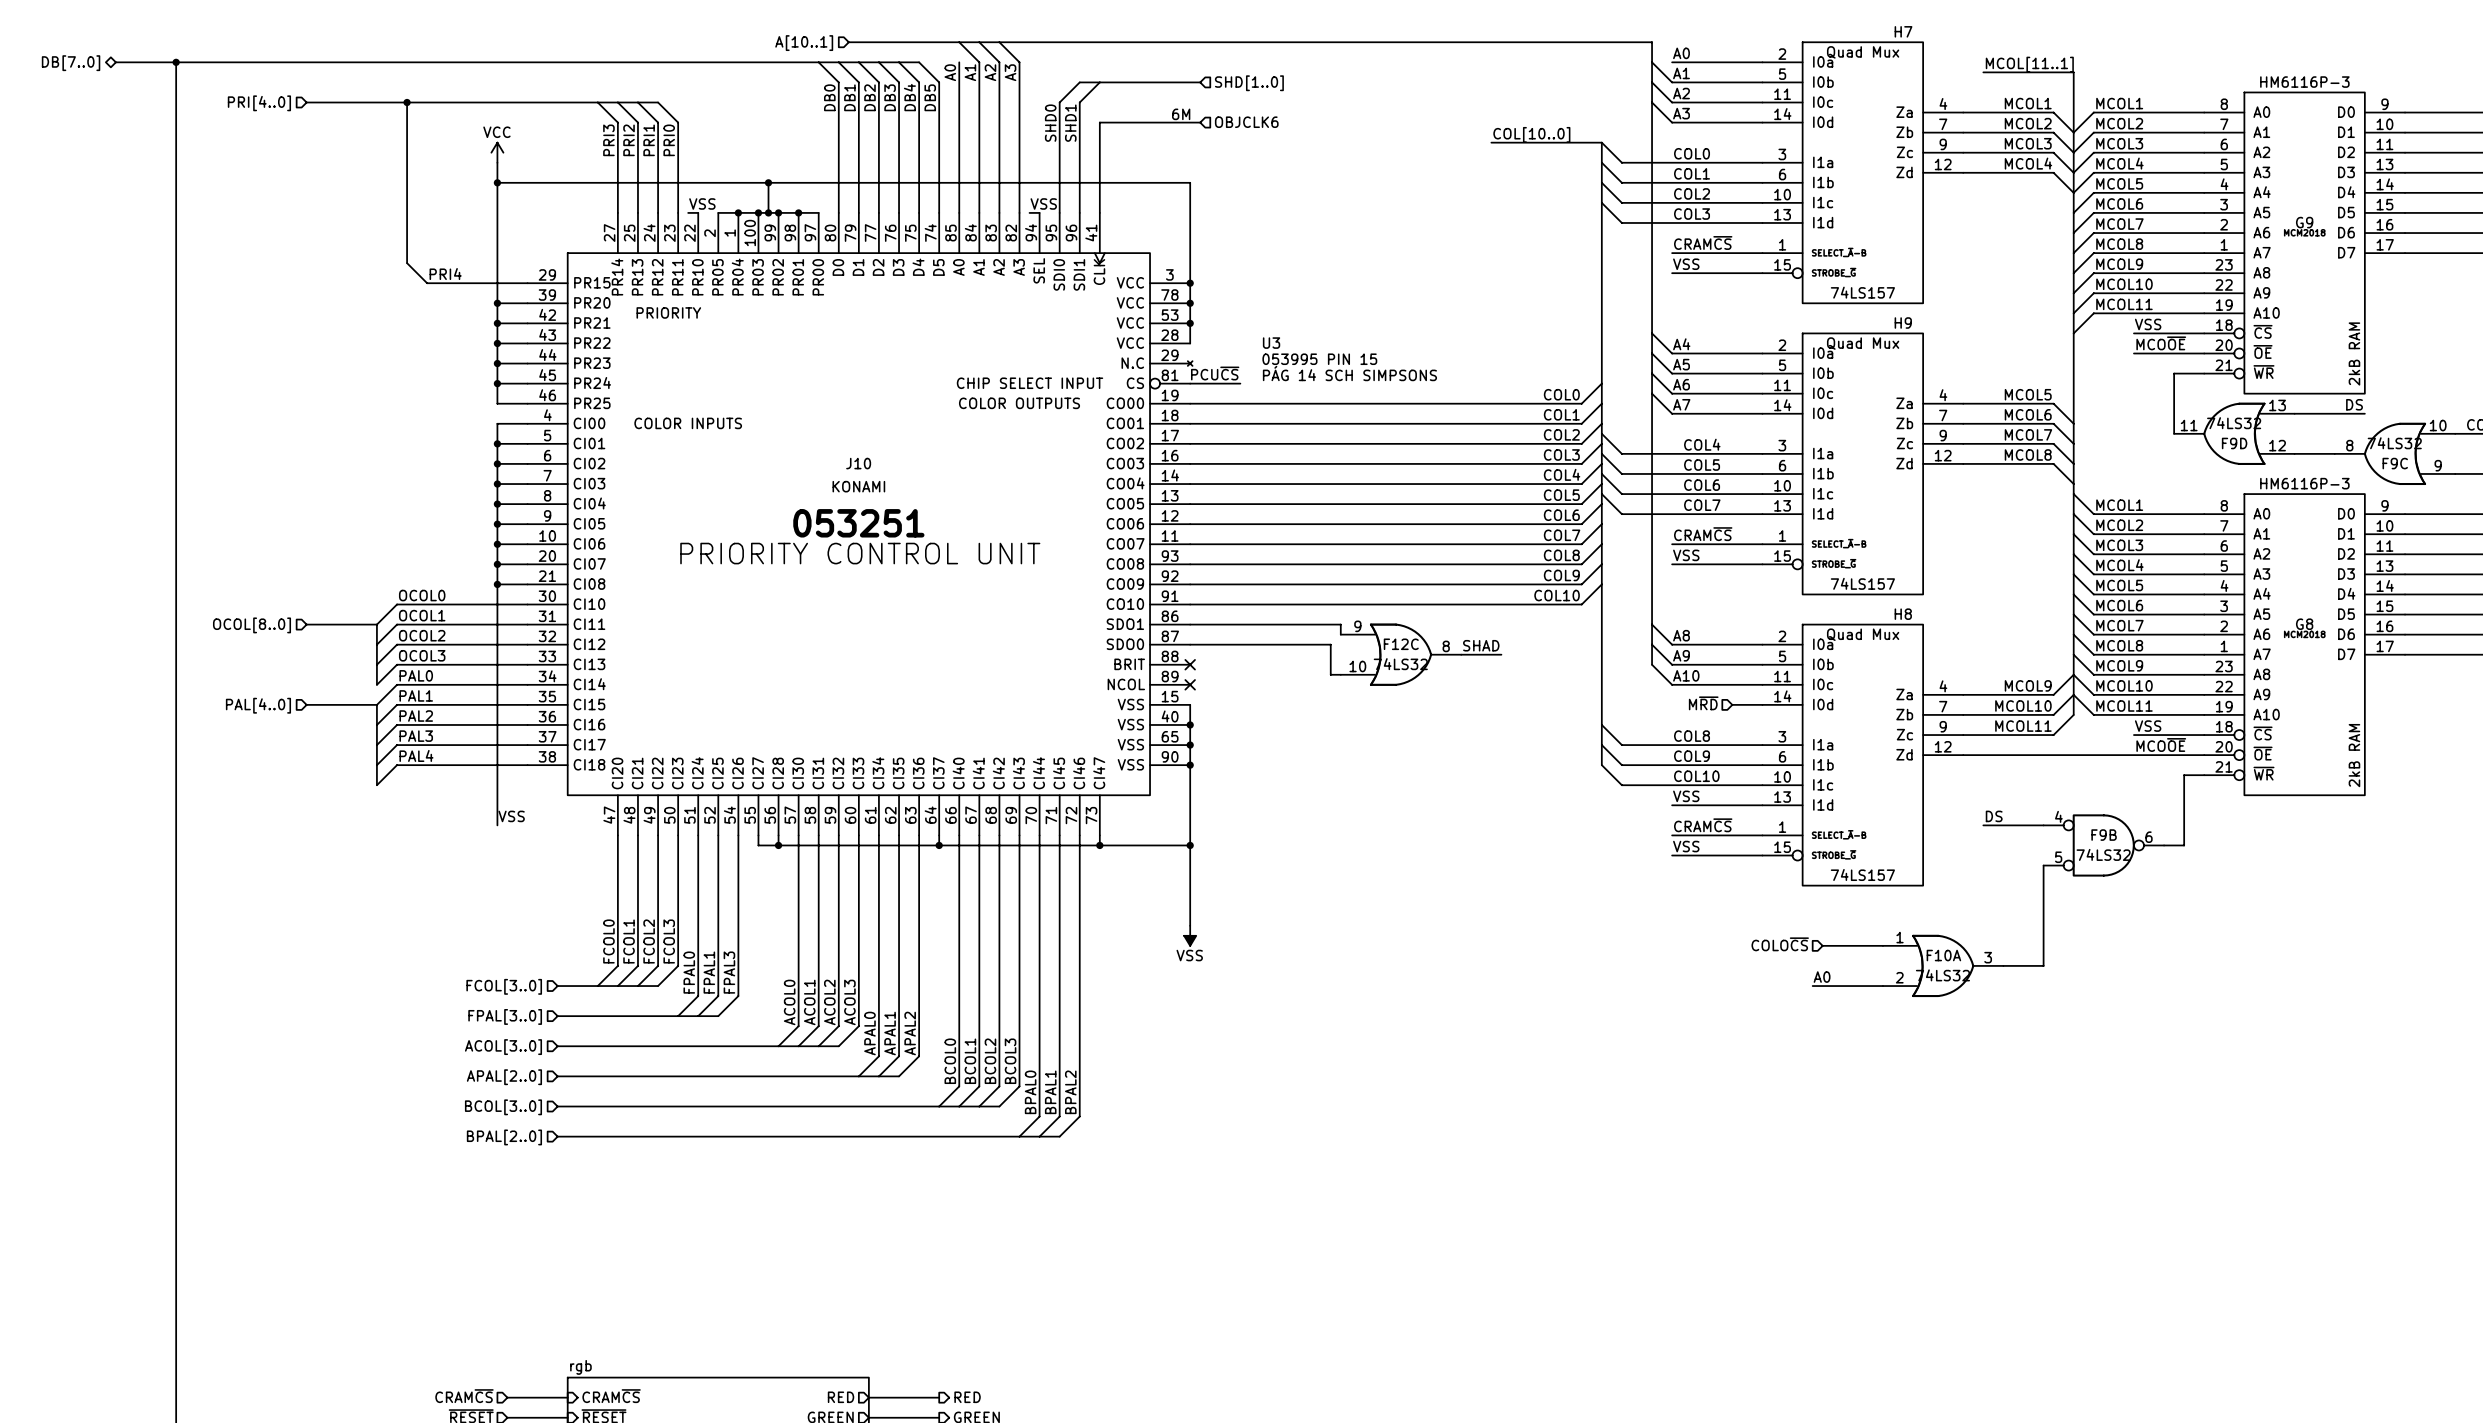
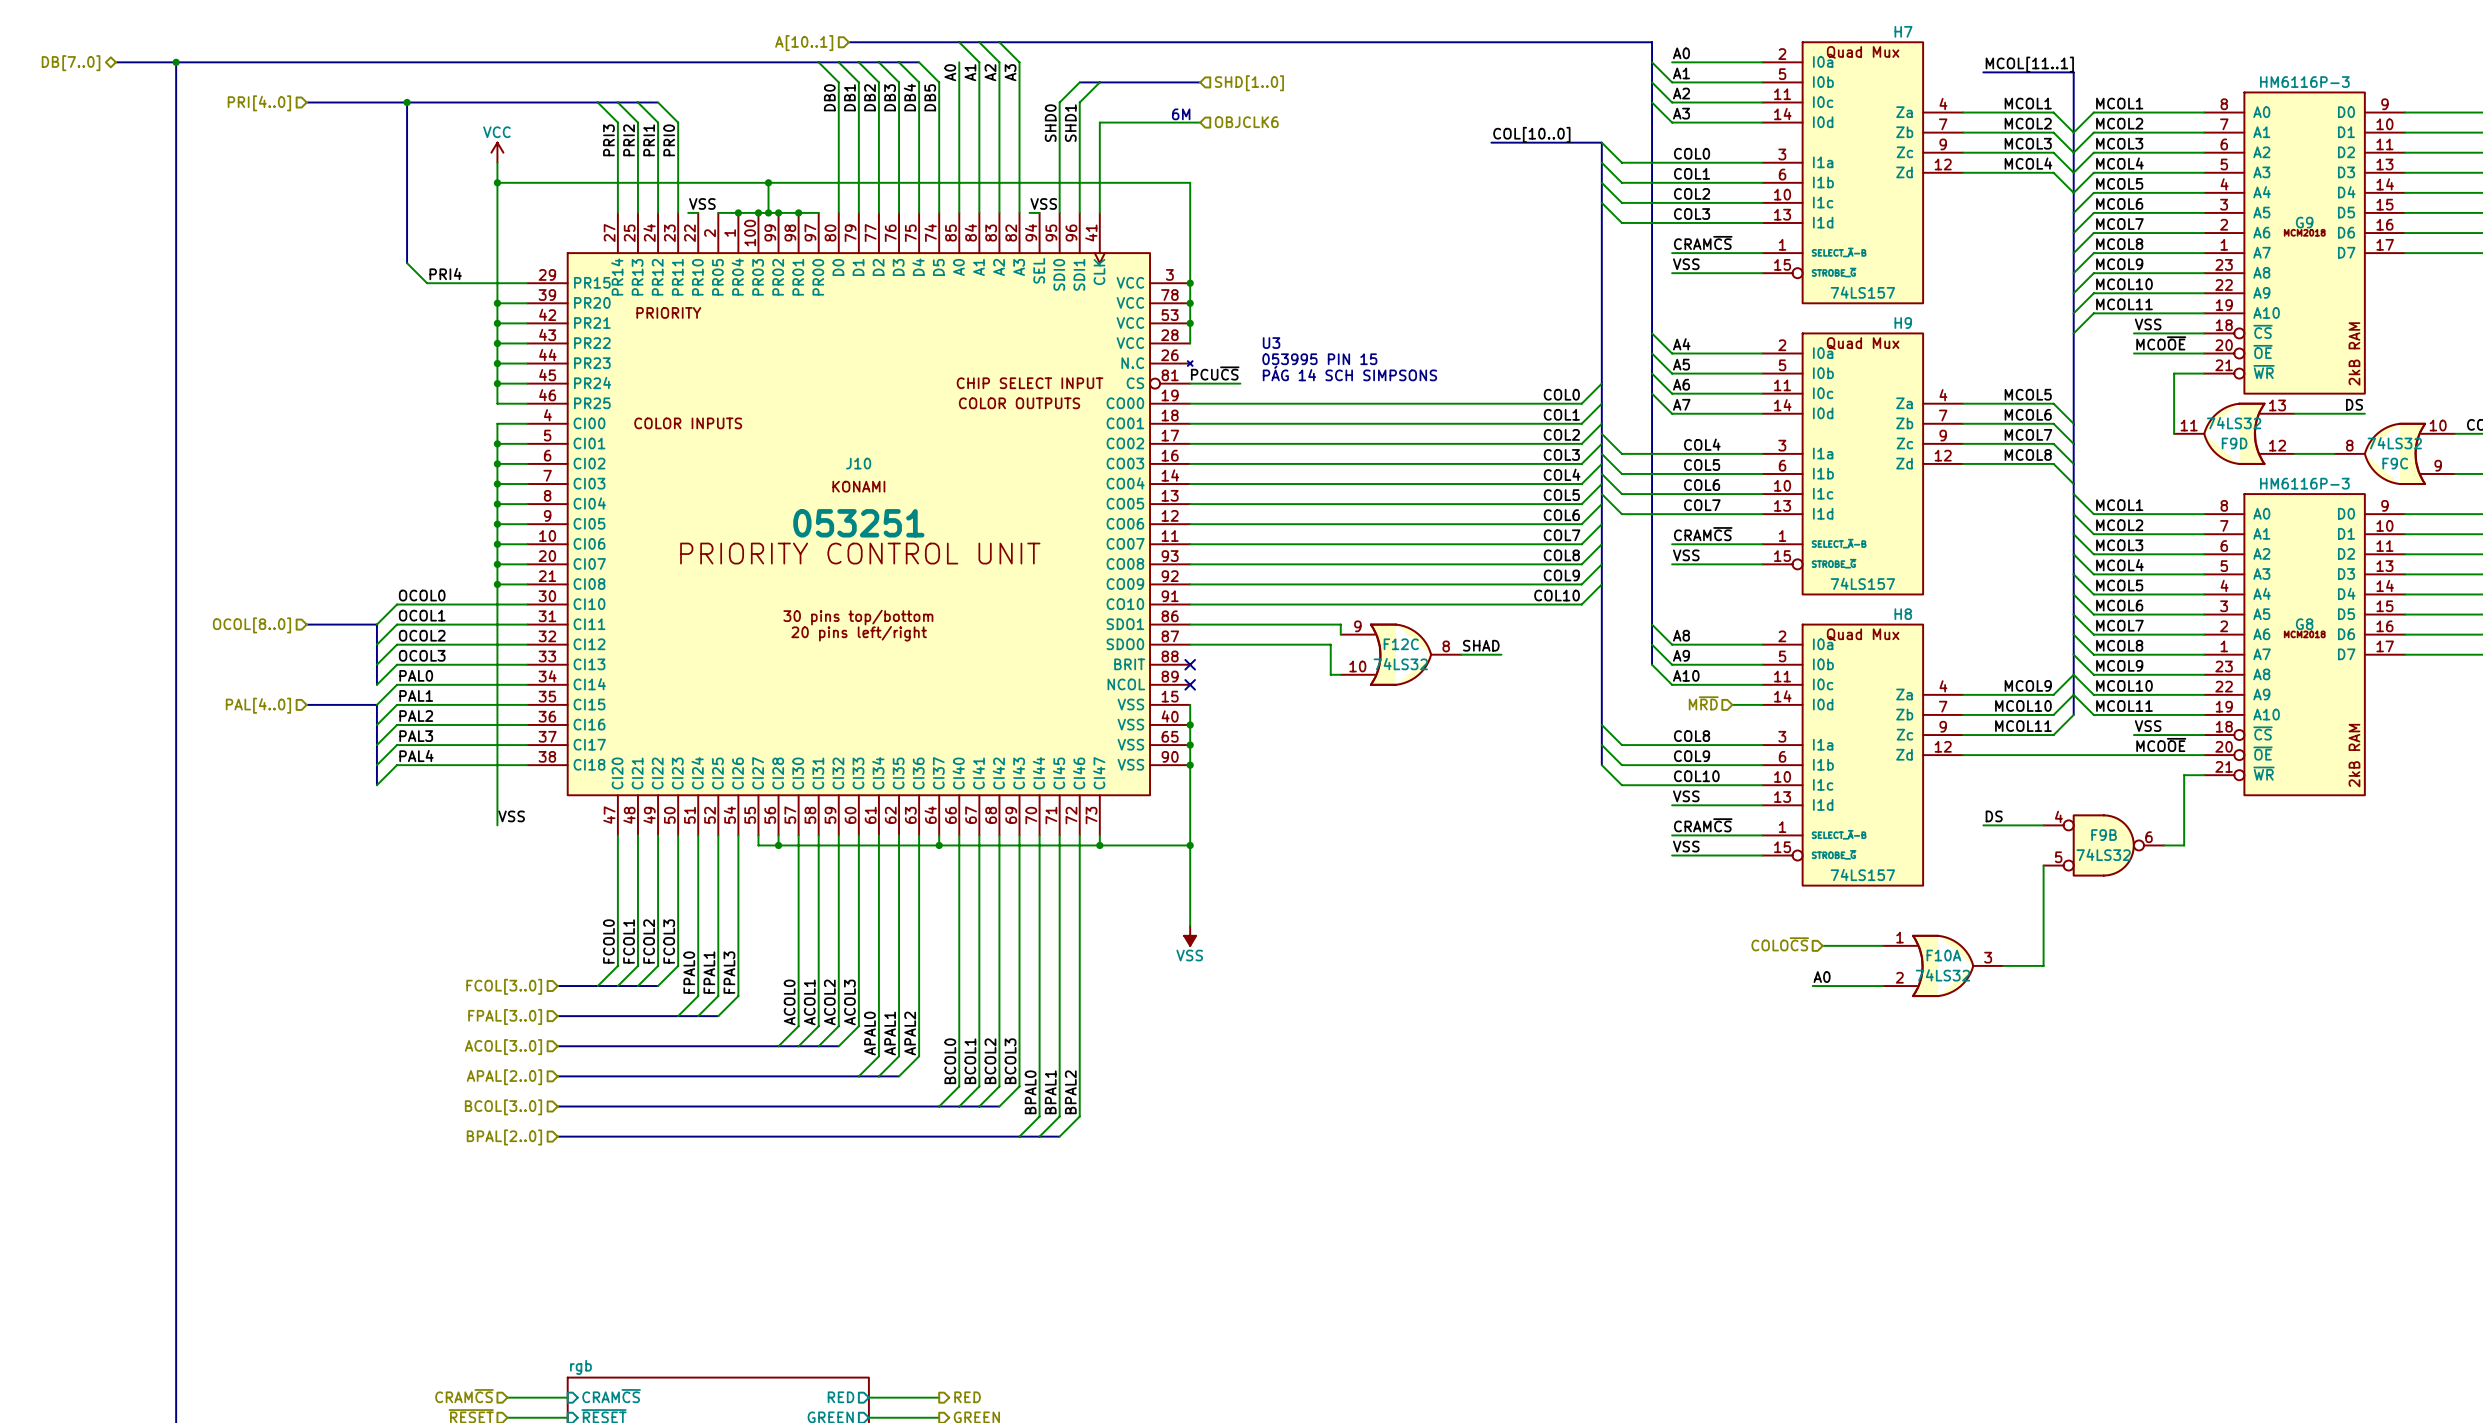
J10 pin number: 29 (1169, 355) -> 26 (1169, 355)
J10 text: none -> 30 pins top/bottom (858, 617)
J10 text: none -> 20 pins left/right (859, 633)

